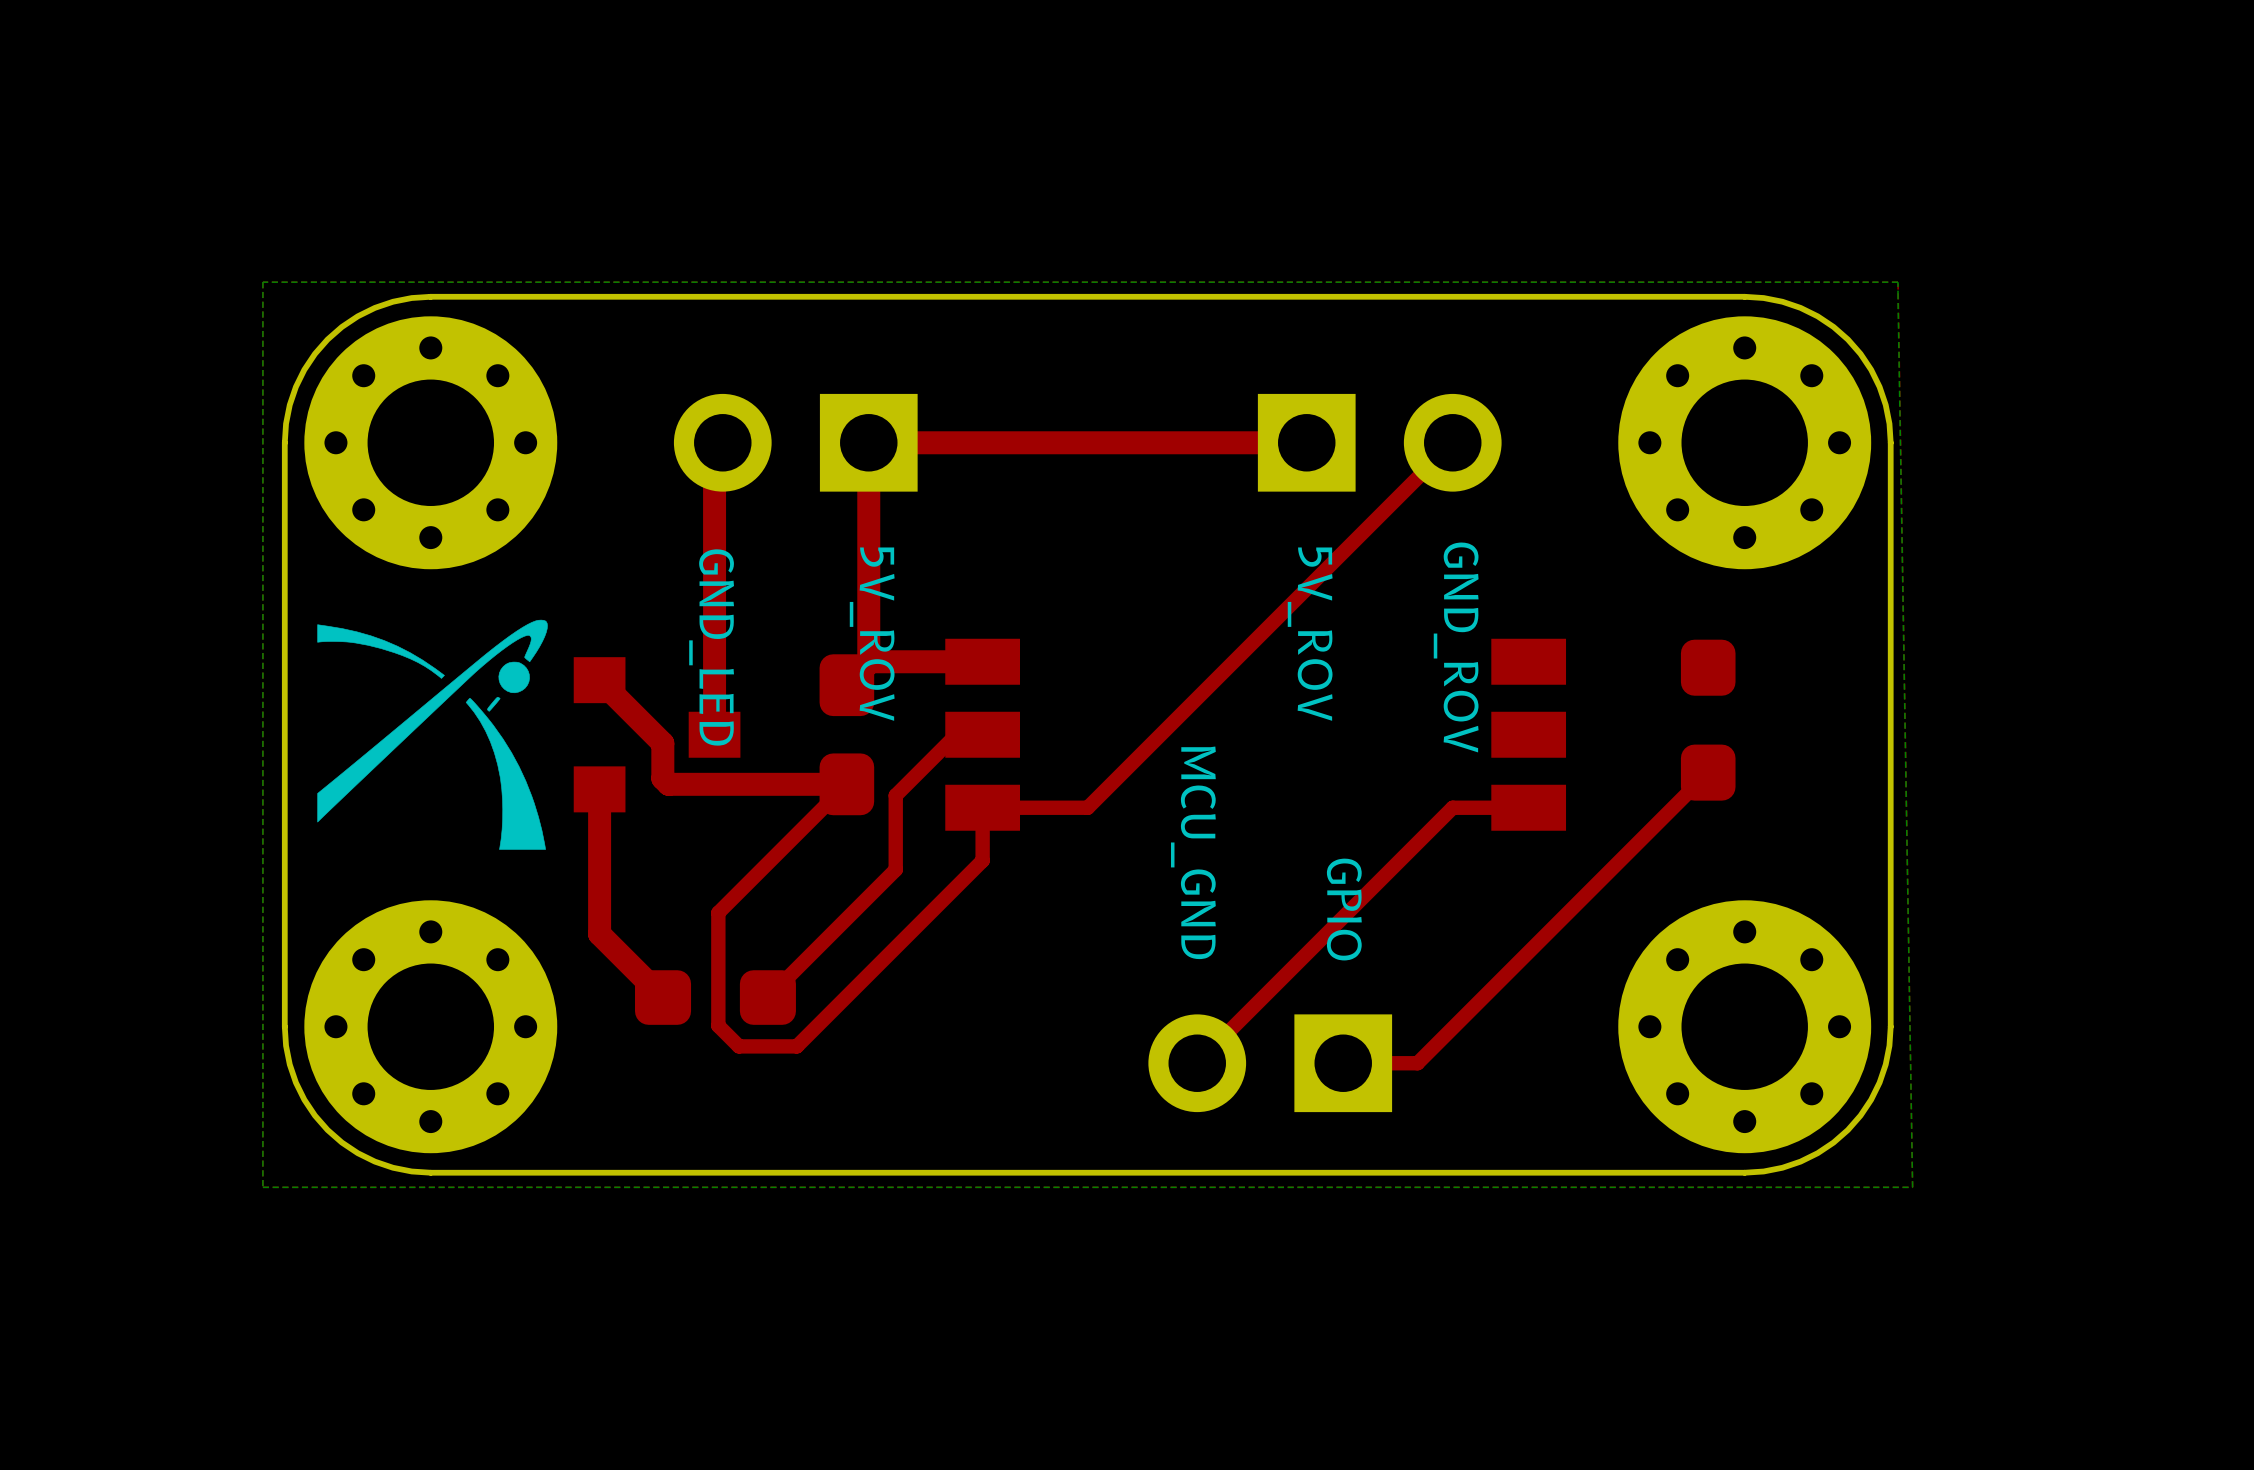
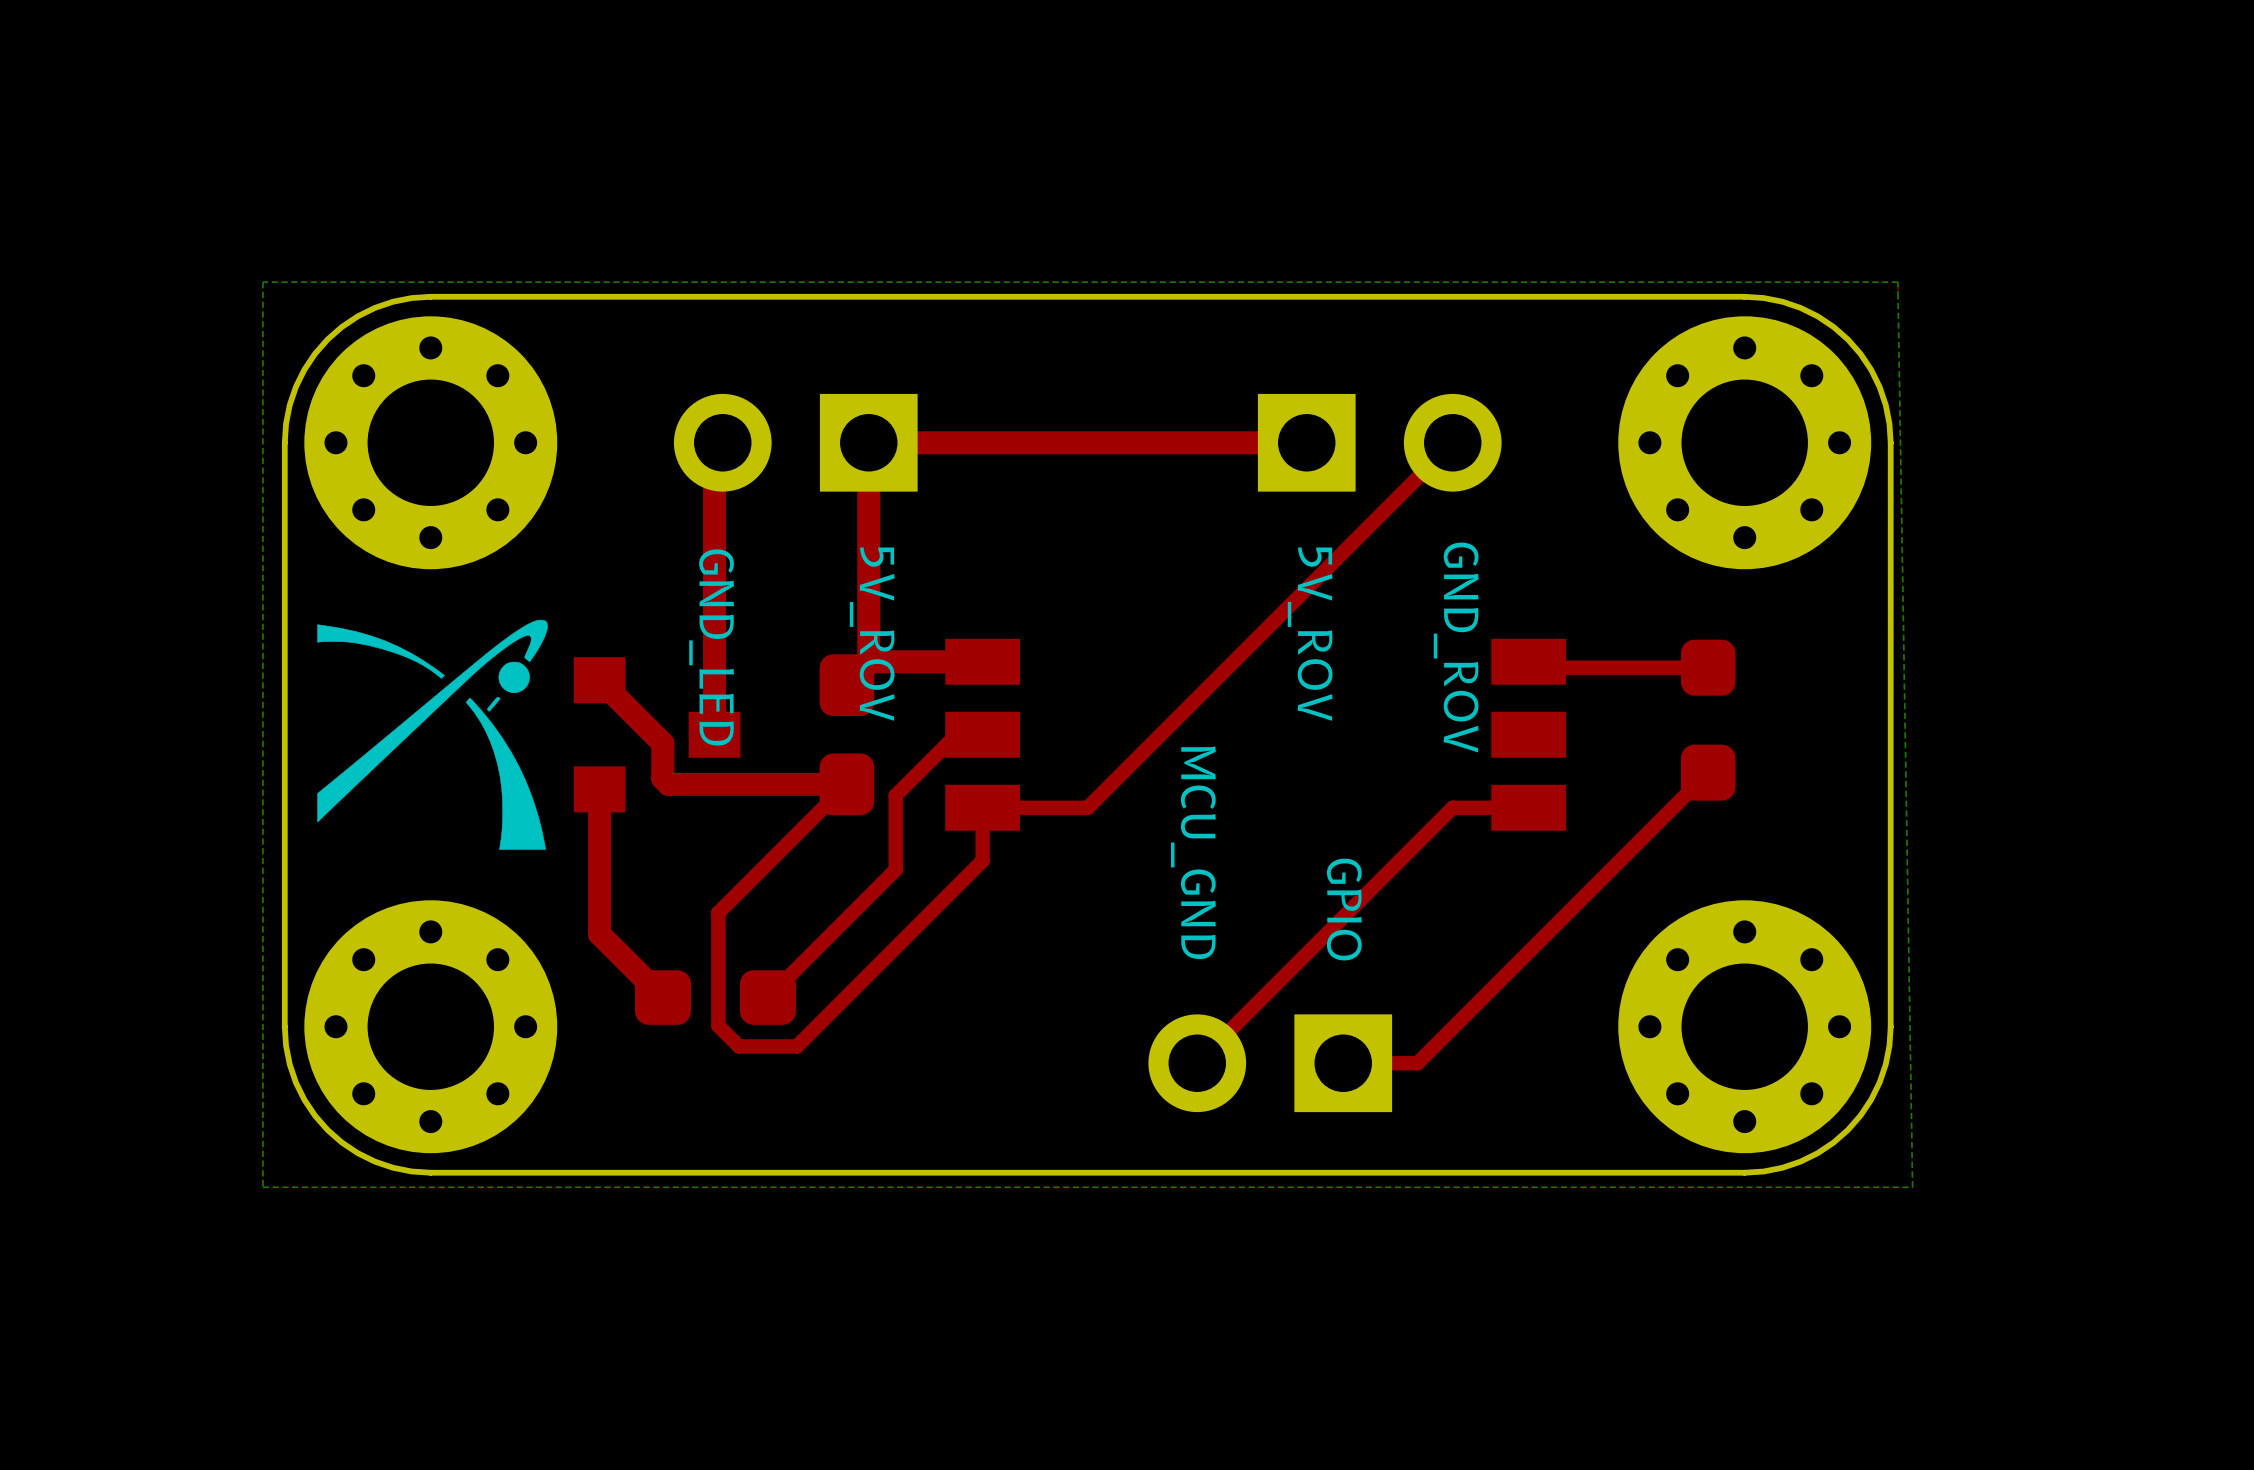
top track: none -> (1528, 661) (1534, 667) (1708, 667)

